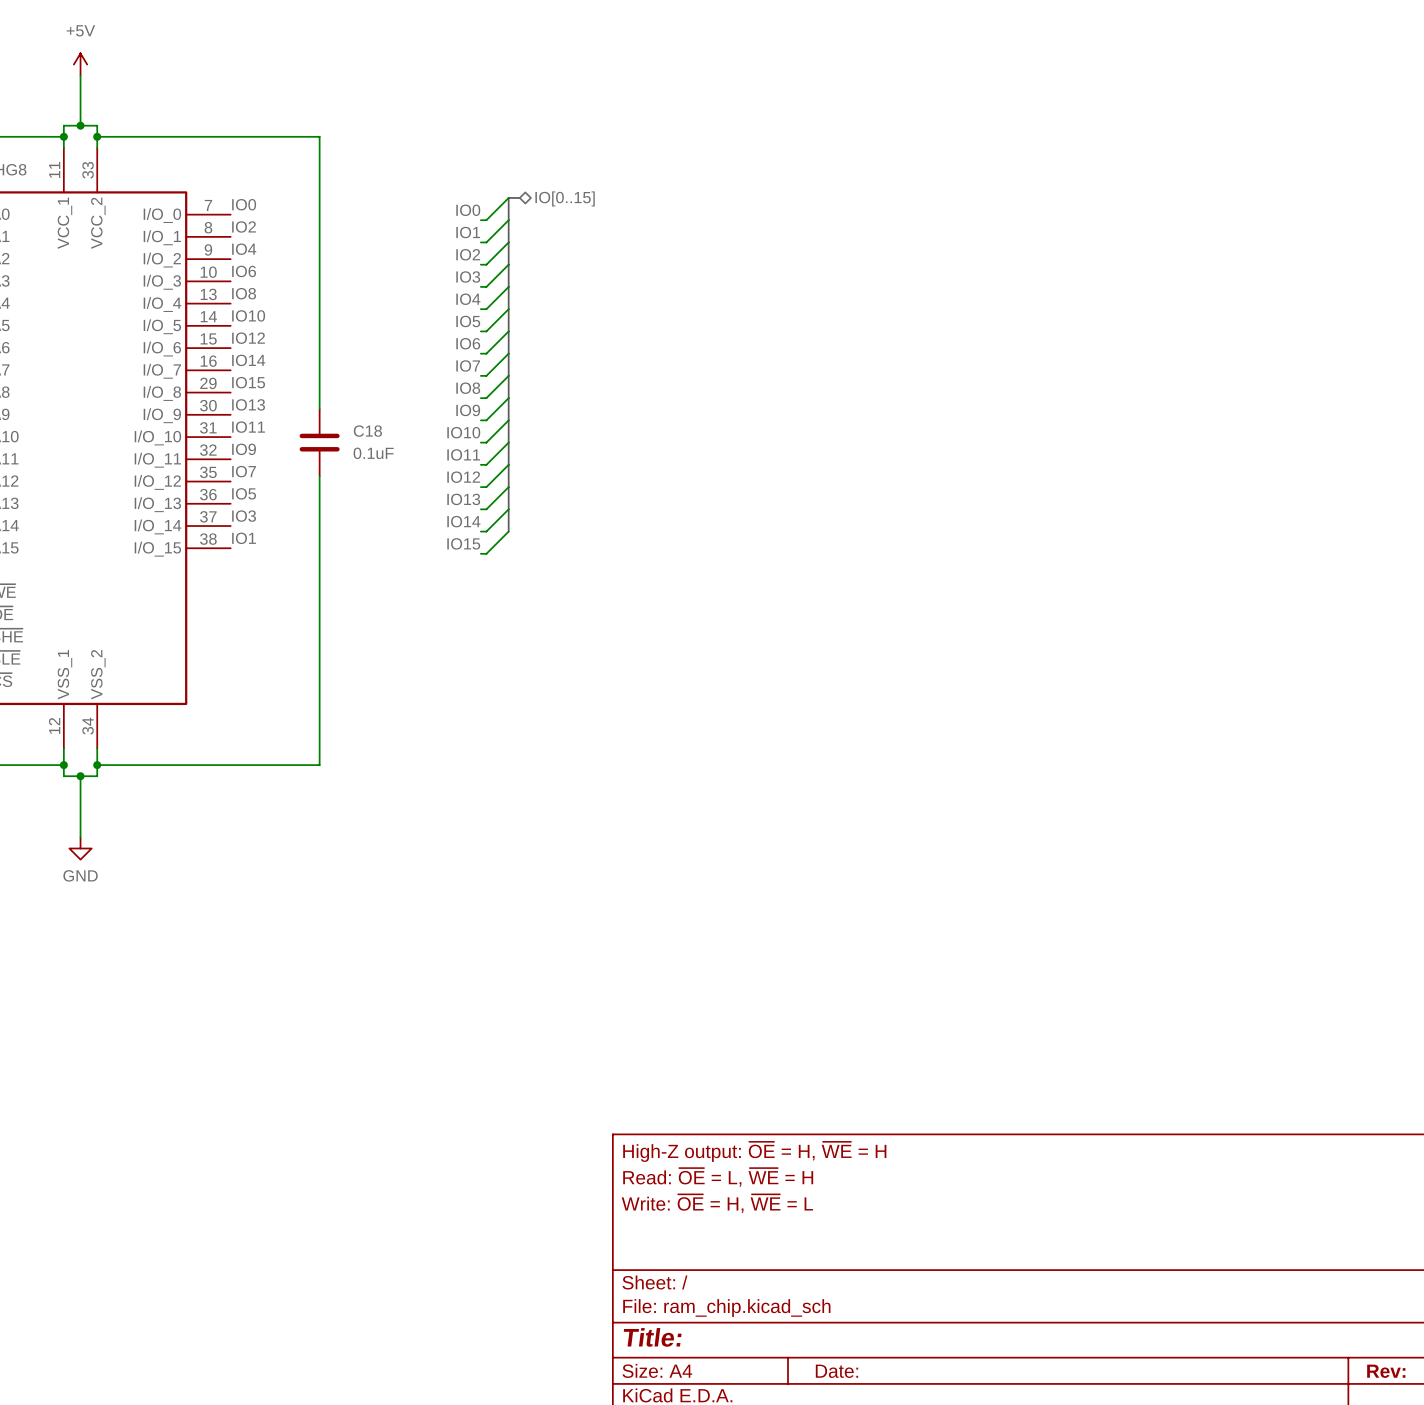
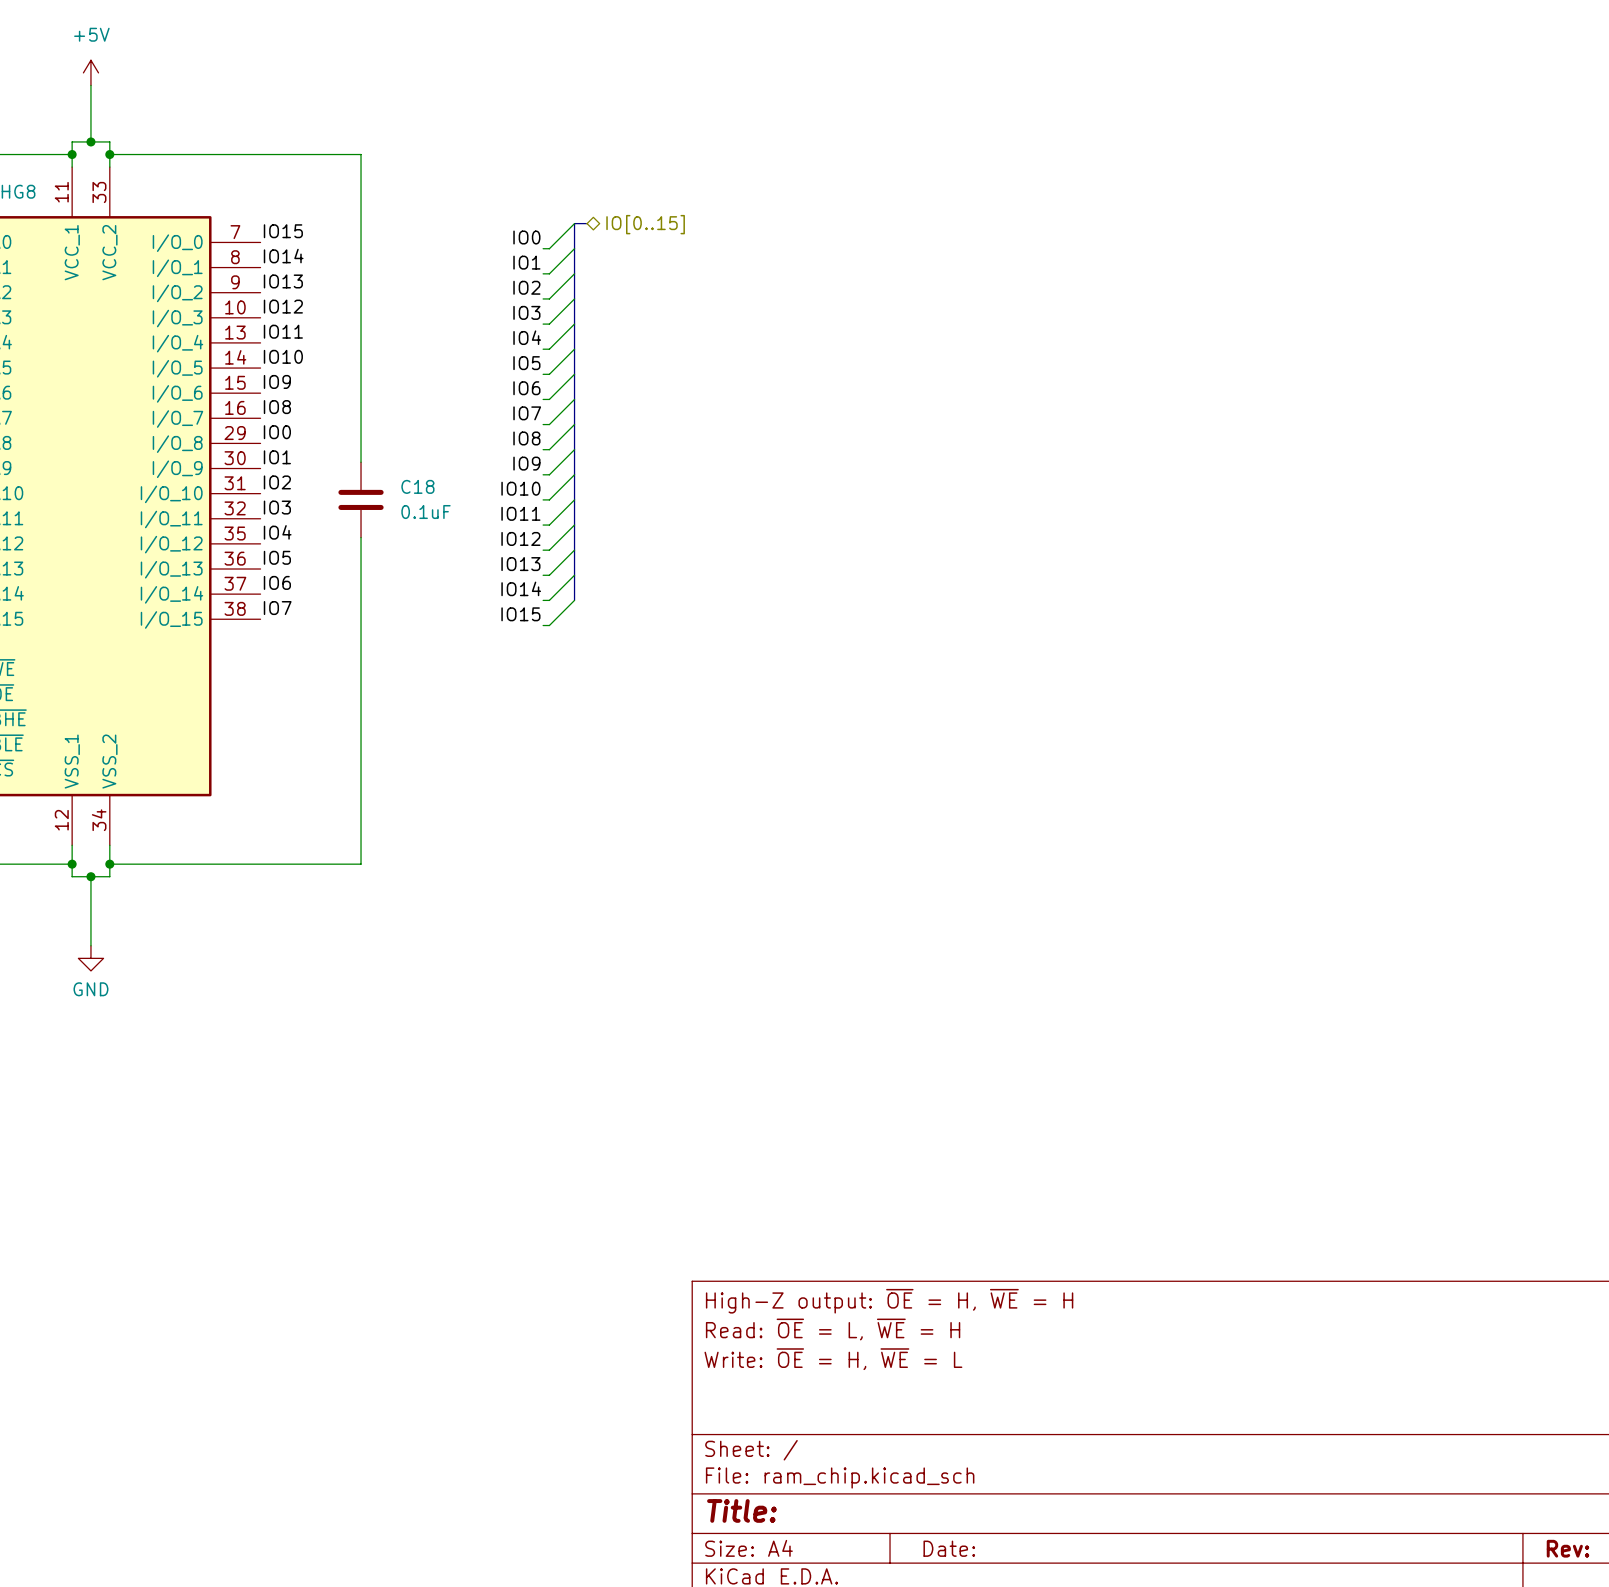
label: IO0 (244, 204) -> IO15 (283, 231)
label: IO2 (244, 226) -> IO14 (283, 256)
label: IO4 (244, 249) -> IO13 (283, 281)
label: IO6 (244, 271) -> IO12 (283, 306)
label: IO8 (244, 293) -> IO11 (283, 331)
label: IO12 (248, 338) -> IO9 (277, 381)
label: IO14 (248, 360) -> IO8 (277, 407)
label: IO15 (248, 382) -> IO0 (277, 432)
label: IO13 (248, 404) -> IO1 (277, 457)
label: IO11 (248, 427) -> IO2 (277, 482)
label: IO9 (244, 449) -> IO3 (277, 507)
label: IO7 (244, 471) -> IO4 (277, 532)
label: IO3 (244, 516) -> IO6 (277, 582)
label: IO1 (244, 538) -> IO7 (277, 608)

